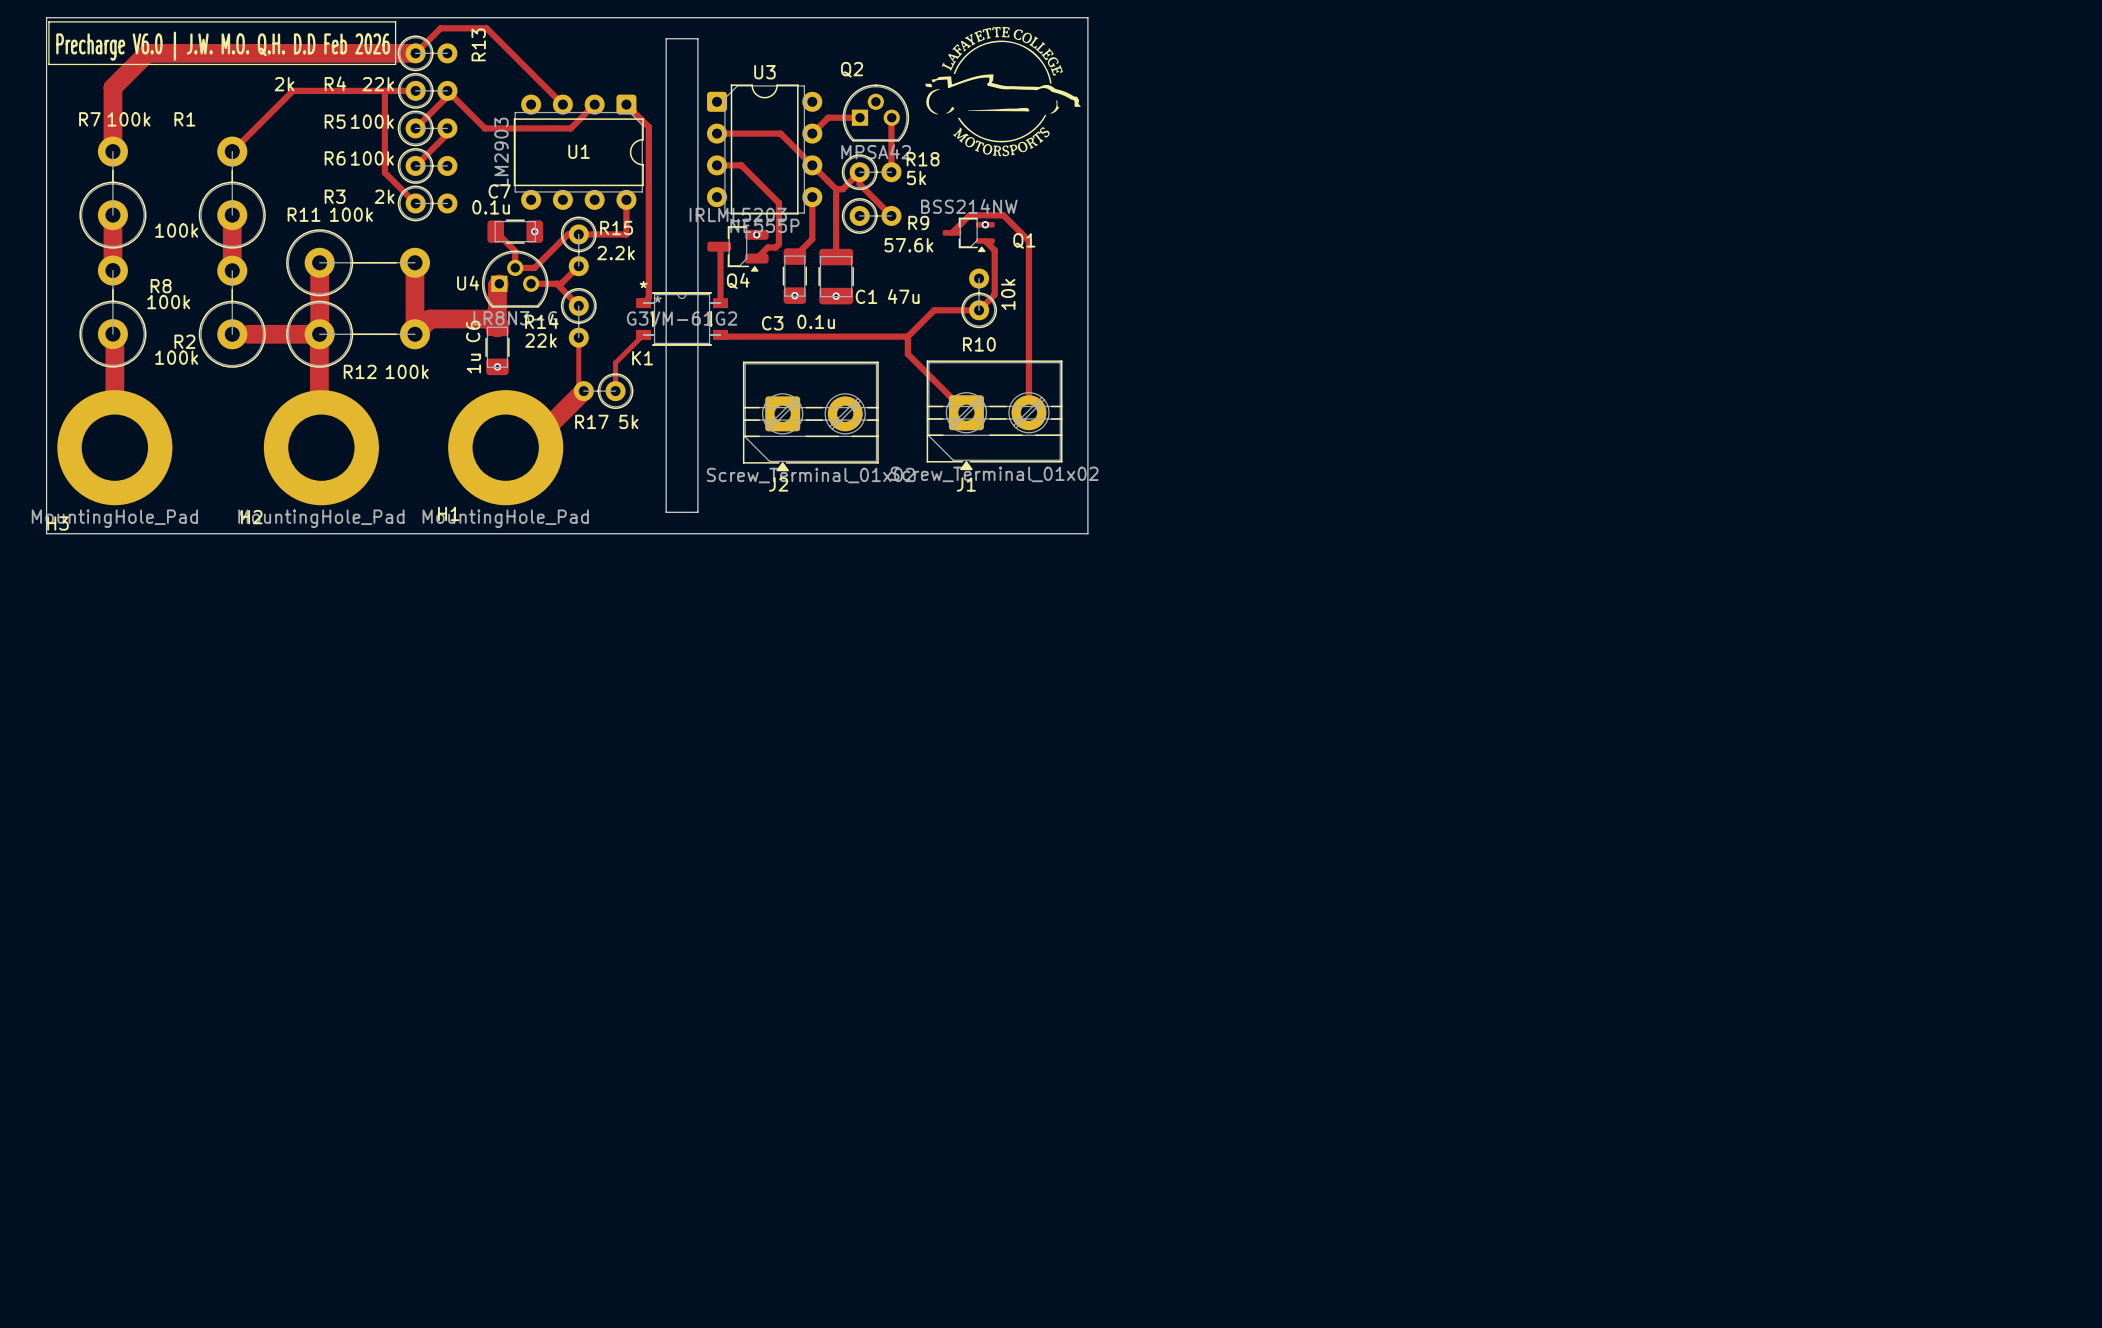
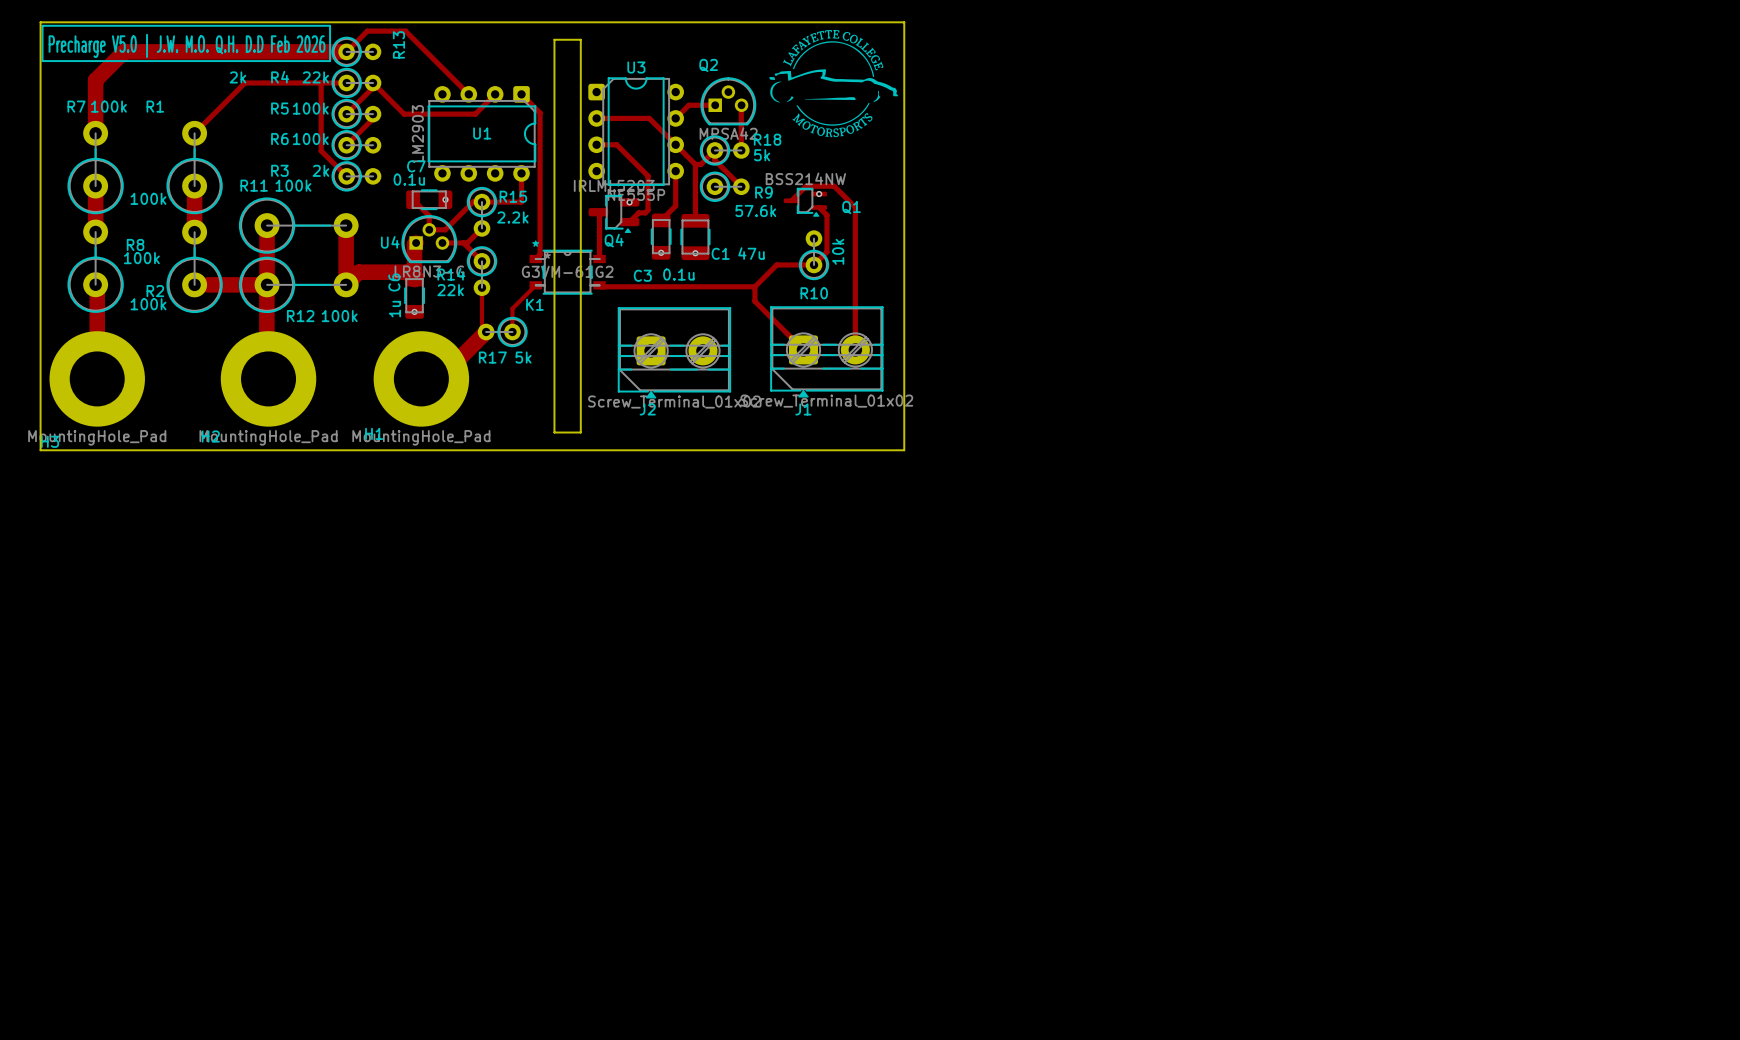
text: Precharge V6.0 | J.W. M.O. Q.H. D.D Feb 2026 (223, 46) -> Precharge V5.0 | J.W. M.O. Q.H. D.D Feb 2026 (187, 45)

